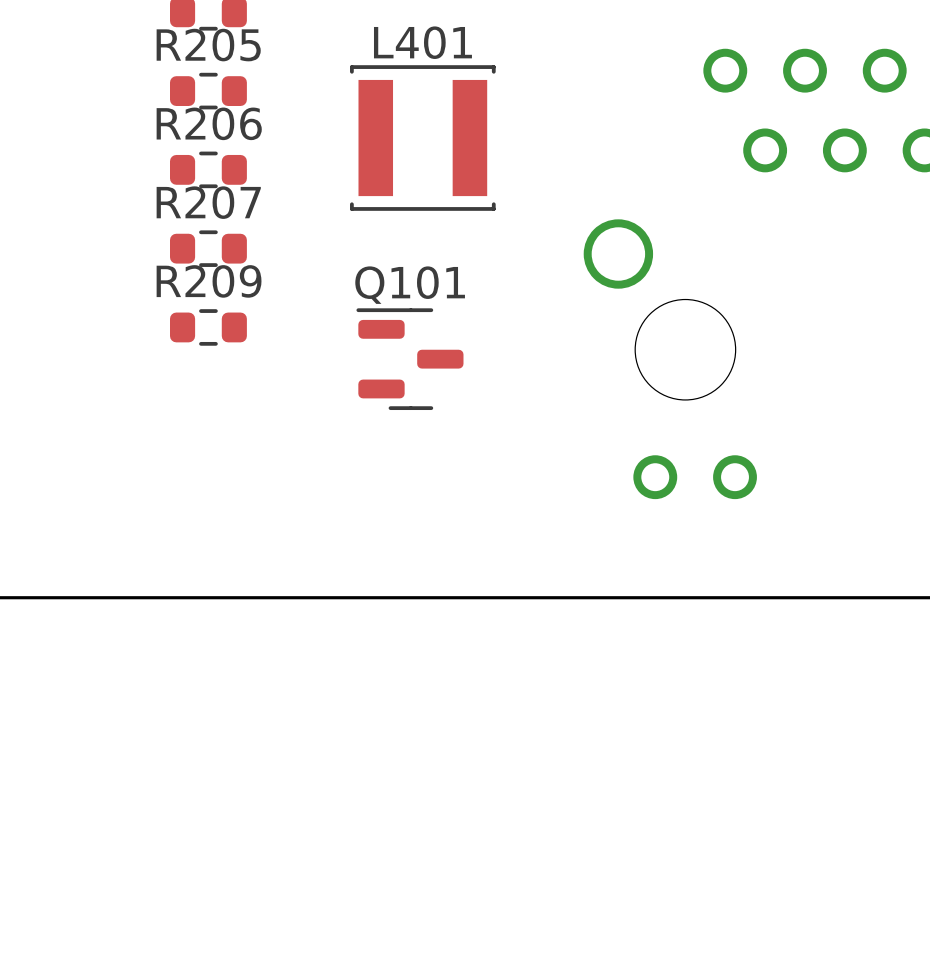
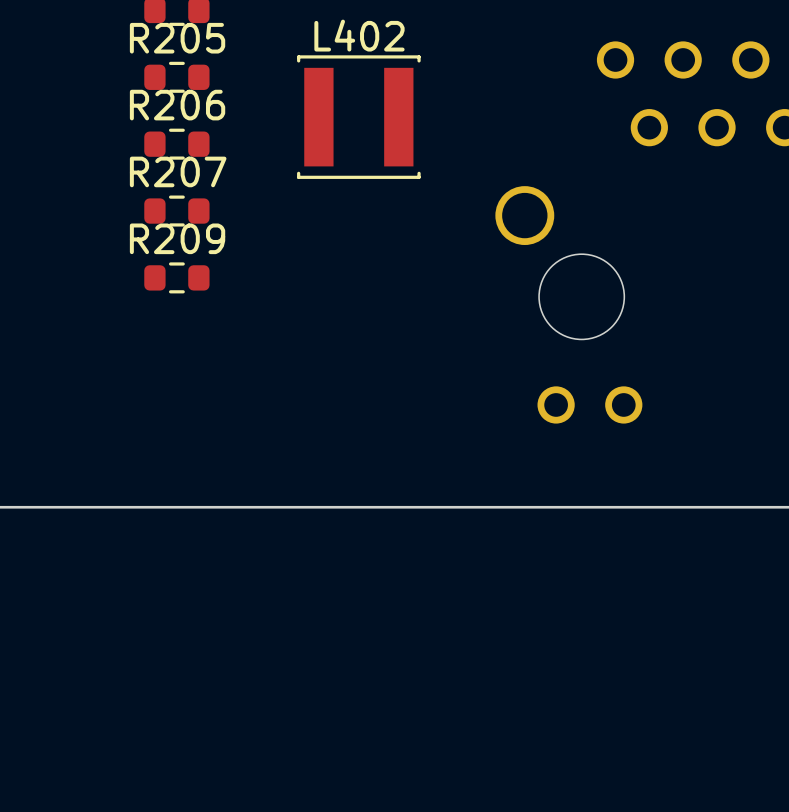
L401 name: L401 (422, 42) -> L402 (359, 35)
Q101: (409, 359) -> none

